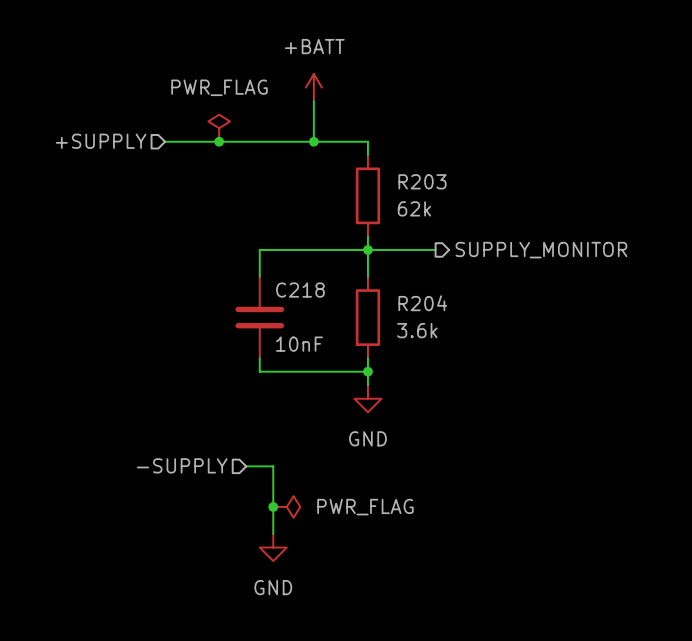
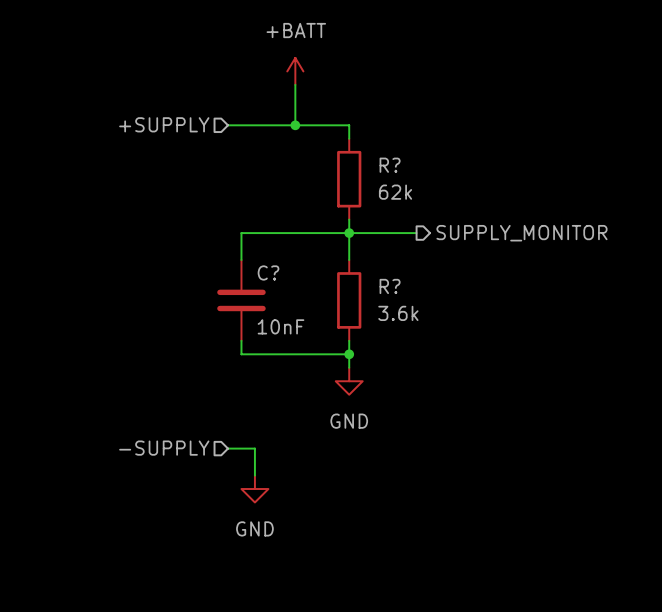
power symbol: PWR_FLAG (219, 128) -> none
hierarchical label position: +SUPPLY (101, 141) -> +SUPPLY (164, 124)
wire: (165, 141) (246, 141) -> none
junction: (219, 141) -> none
R203 name: R203 (422, 181) -> R? (390, 165)
C218 name: C218 (300, 290) -> C? (268, 272)
R204 name: R204 (422, 303) -> R? (390, 286)
wire: (273, 493) (273, 534) -> none
junction: (273, 506) -> none
power symbol: PWR_FLAG (286, 506) -> none
power symbol position: GND (273, 547) -> GND (254, 489)

